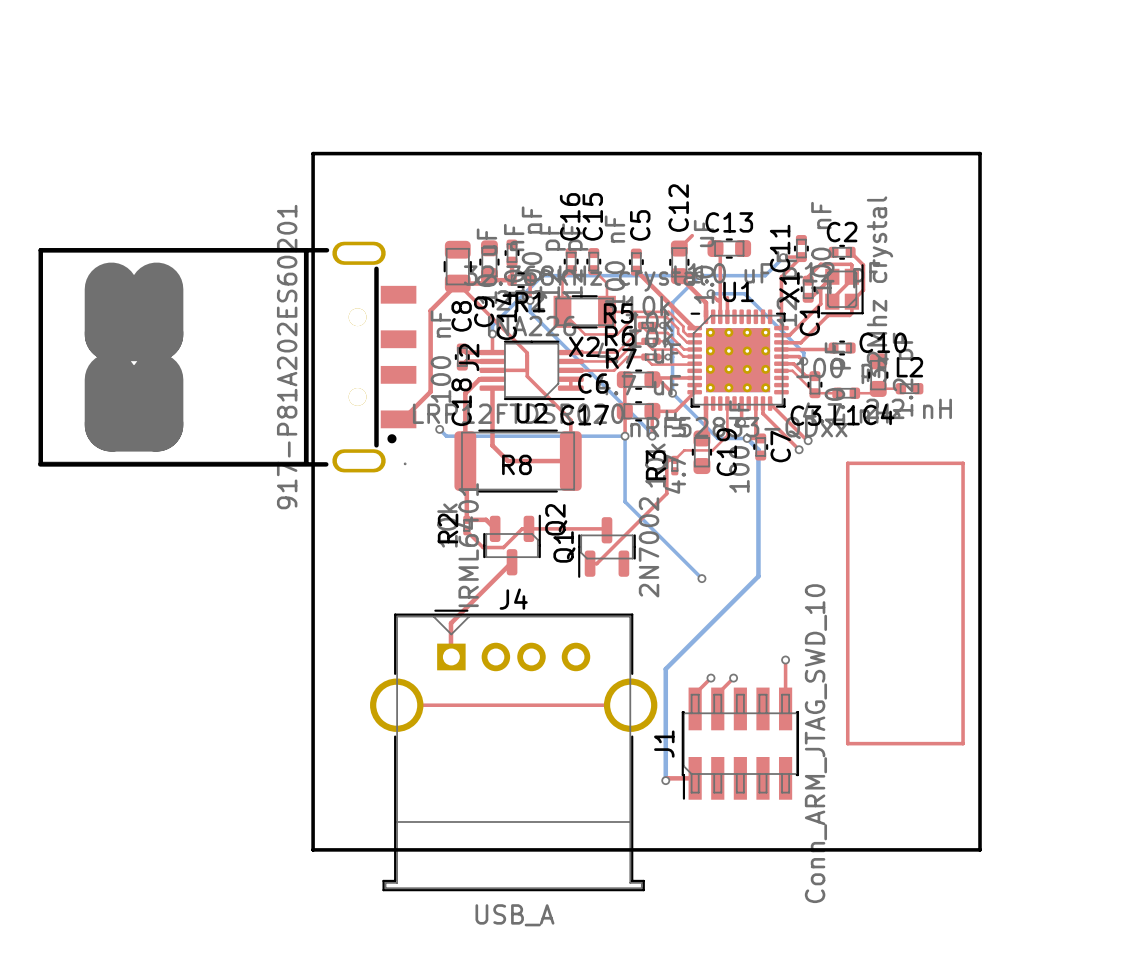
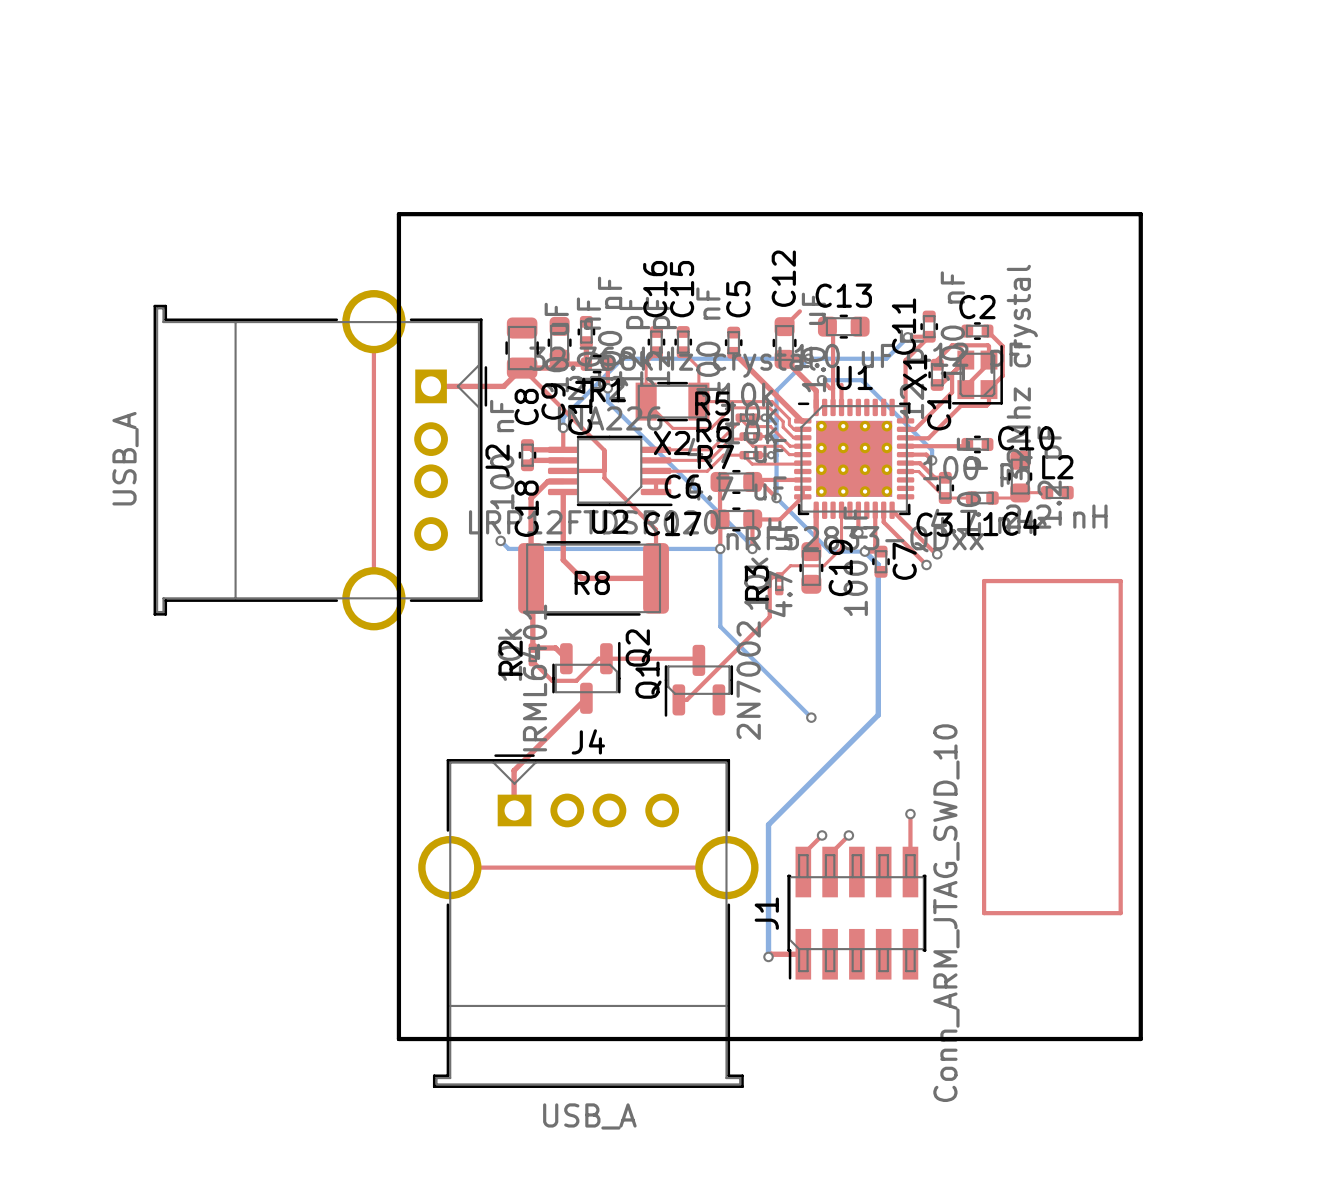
board edge: (353, 153) (313, 153) (313, 849) (353, 849) -> (398, 214) (398, 1039)
J2 footprint: [37, 241, 417, 473] -> [153, 290, 488, 631]
top track: none -> (373, 321) (373, 598)
top track: (442, 298) (430, 310) (430, 391) (403, 419) -> (503, 386) (431, 386)
J2 value: 917-P81A202ES60201 (287, 357) -> USB_A (125, 458)
J2 name position: J2 (469, 357) -> J2 (497, 460)

